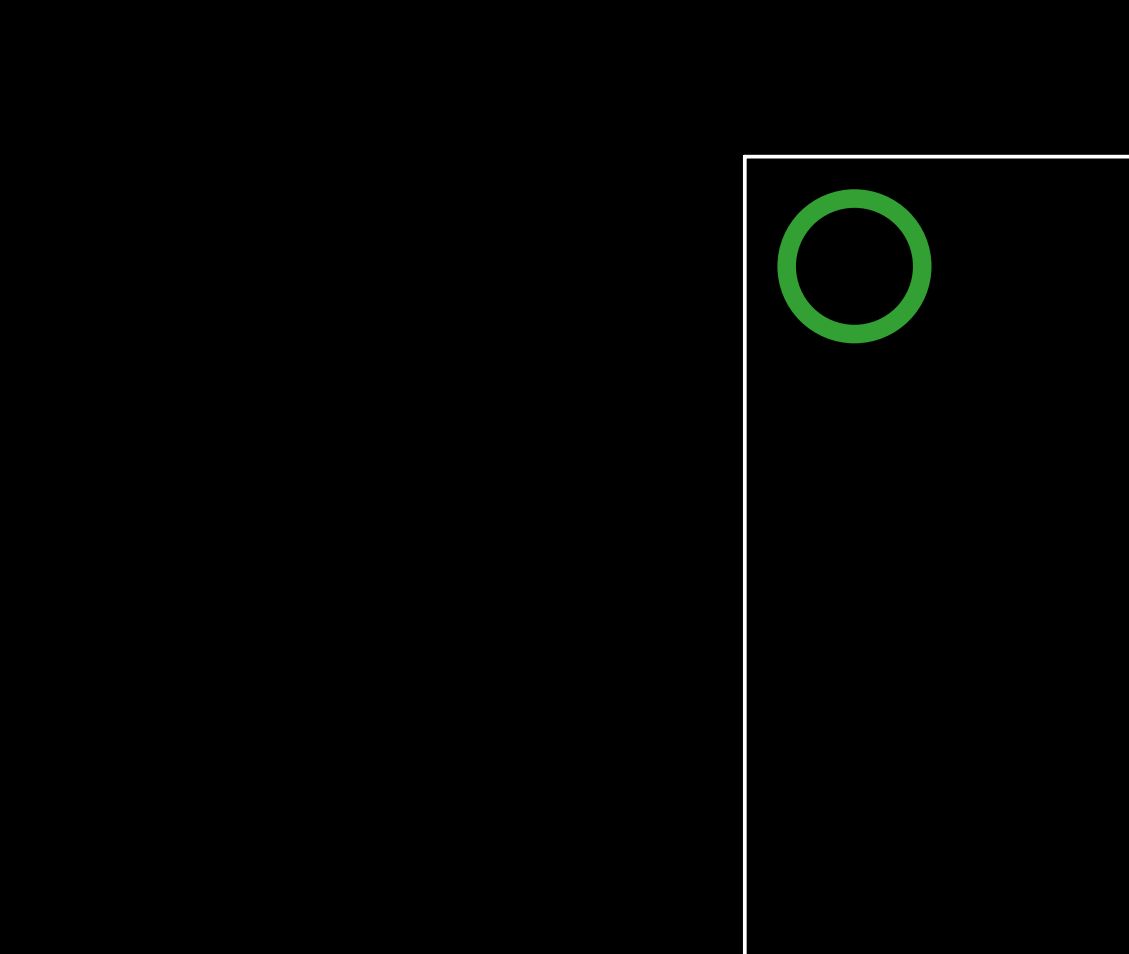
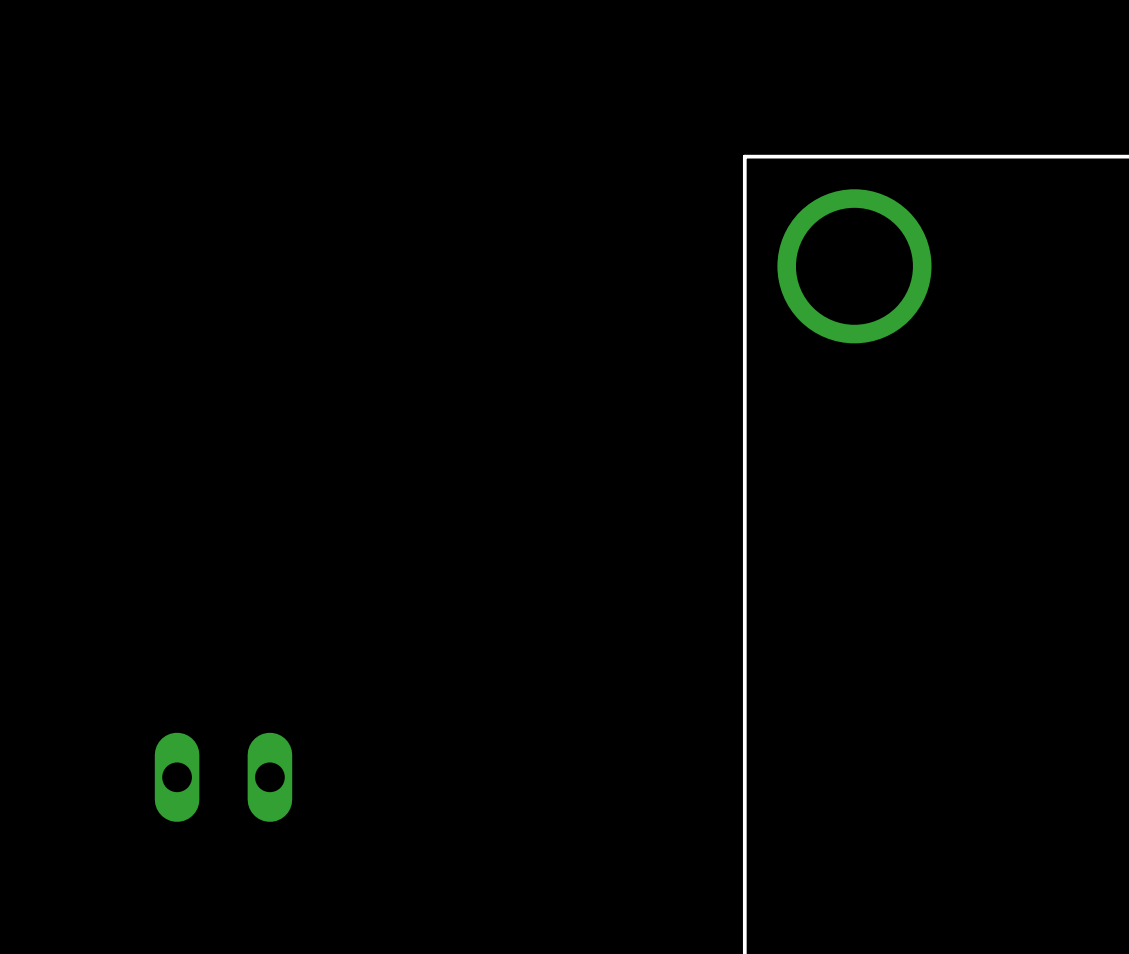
part: none -> (223, 777)

